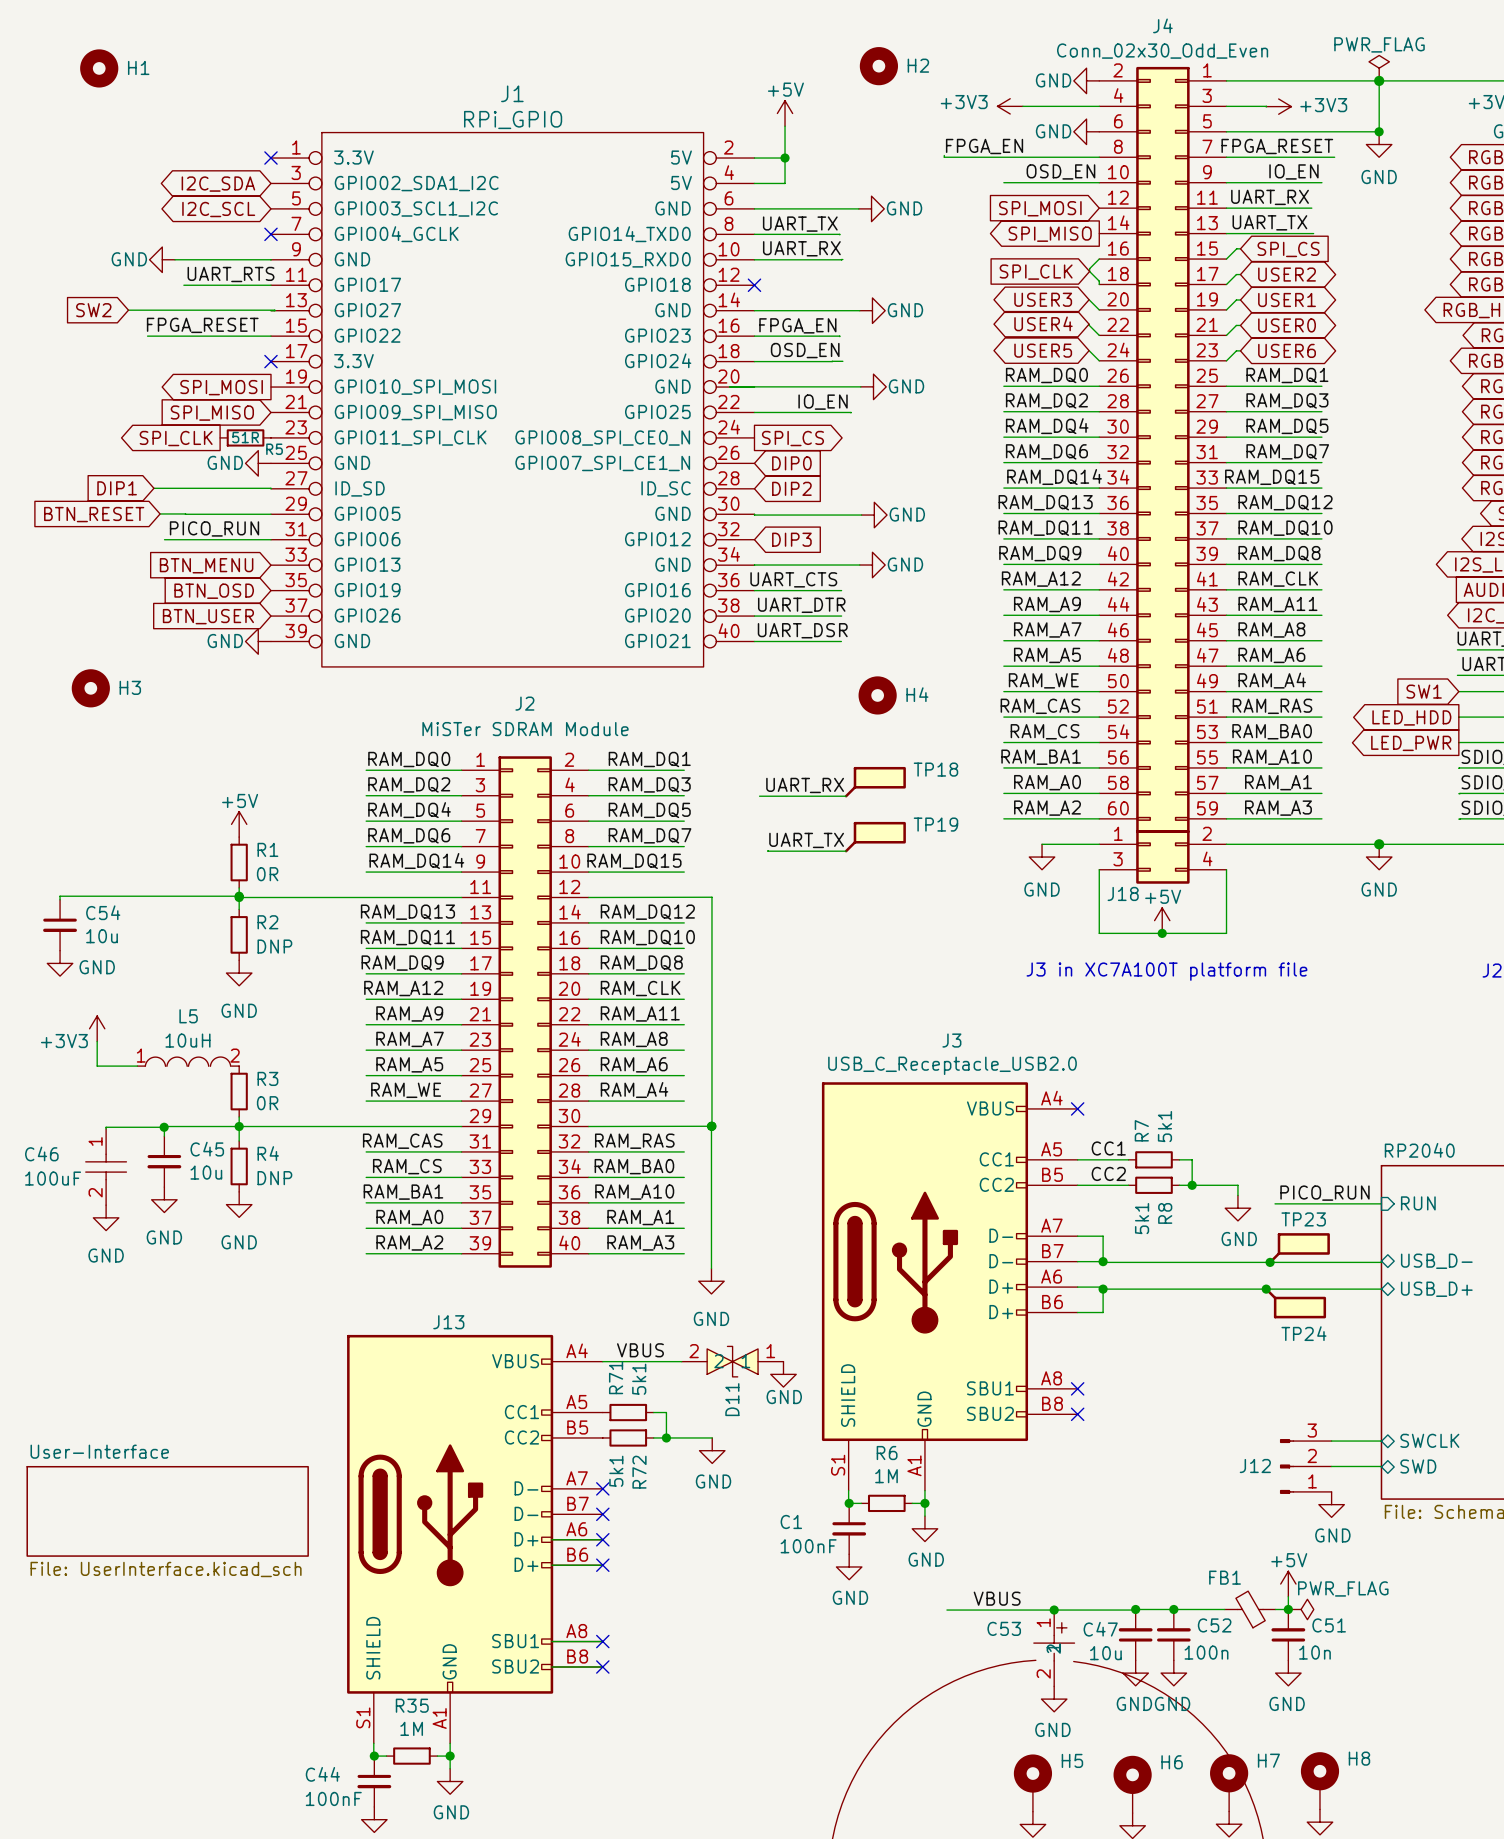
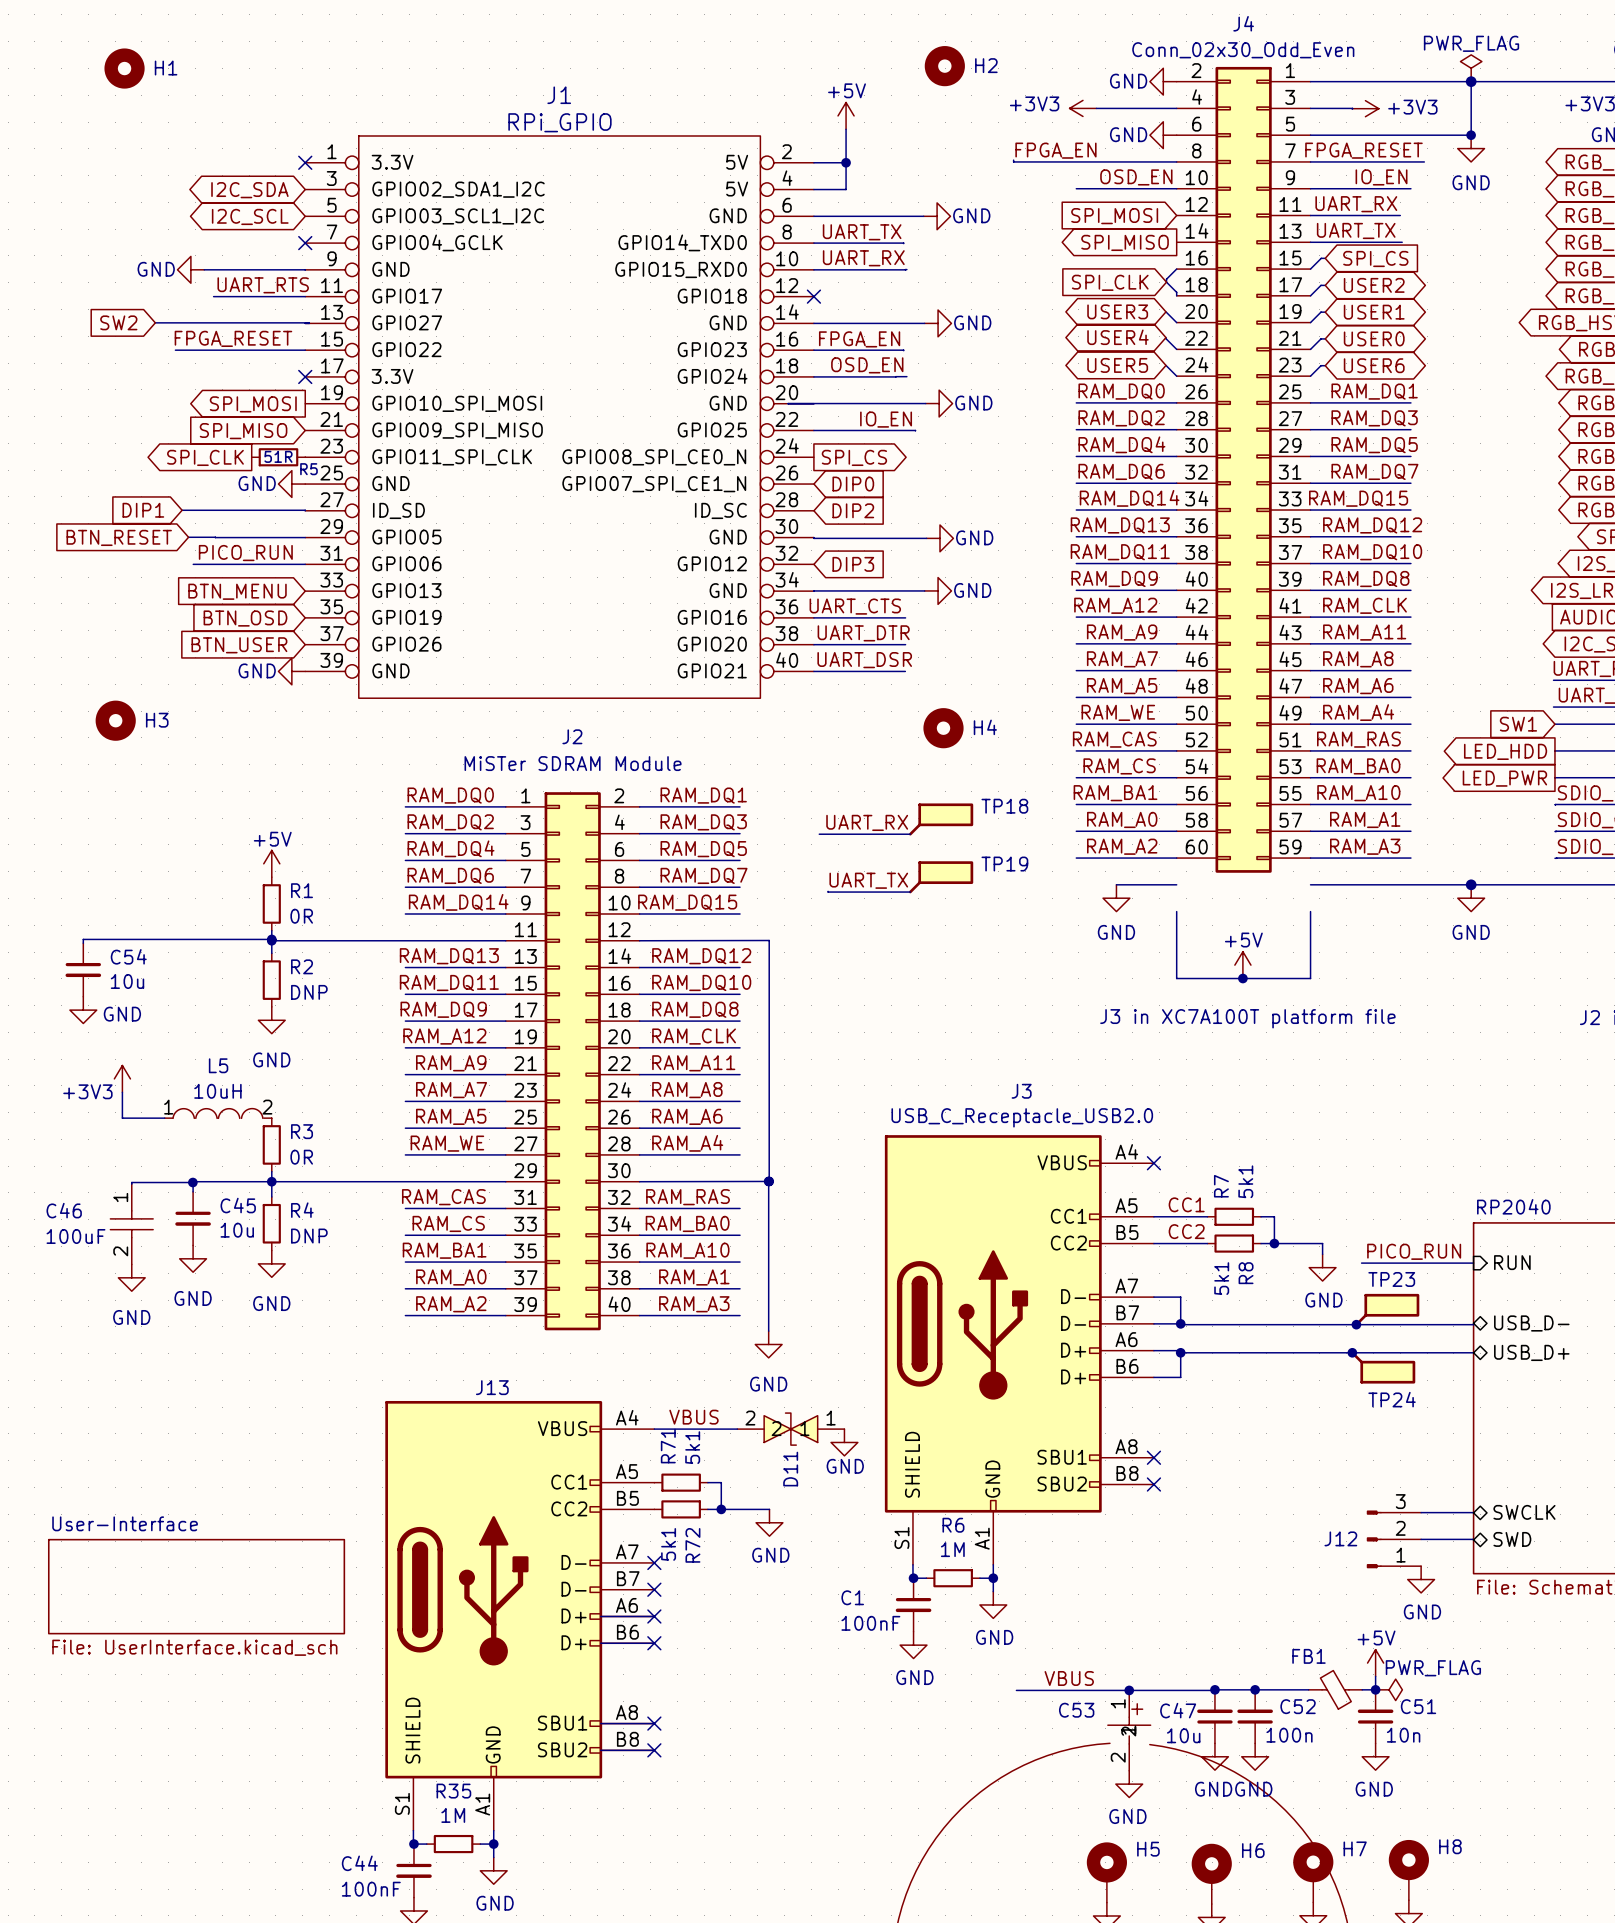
J18: (1162, 857) -> none

